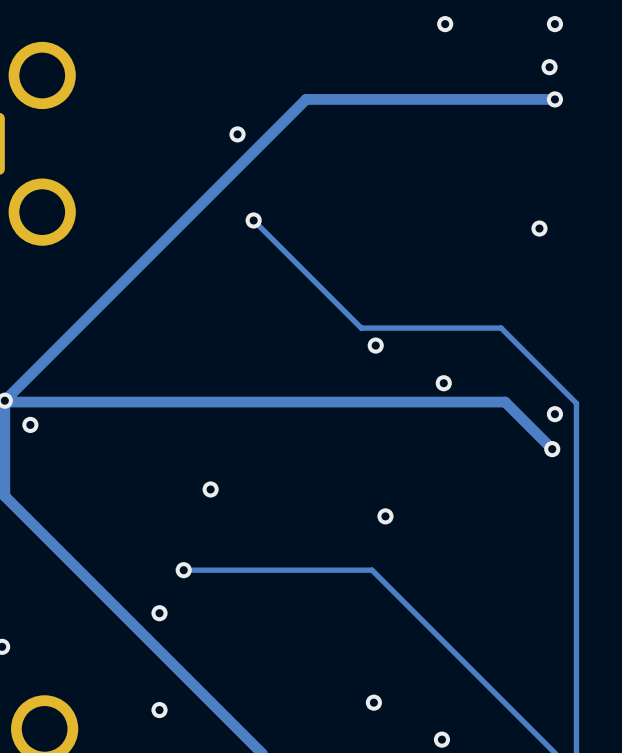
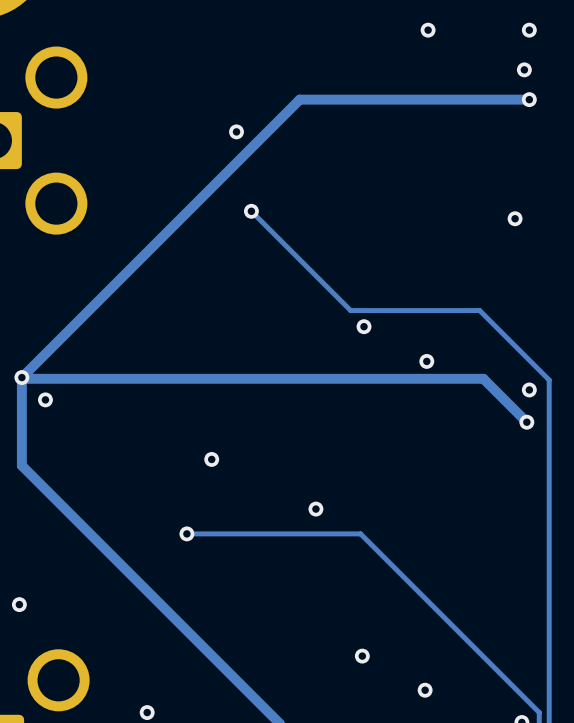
via position: (385, 516) -> (315, 509)
via: (159, 613) -> none
via: (159, 710) -> none

